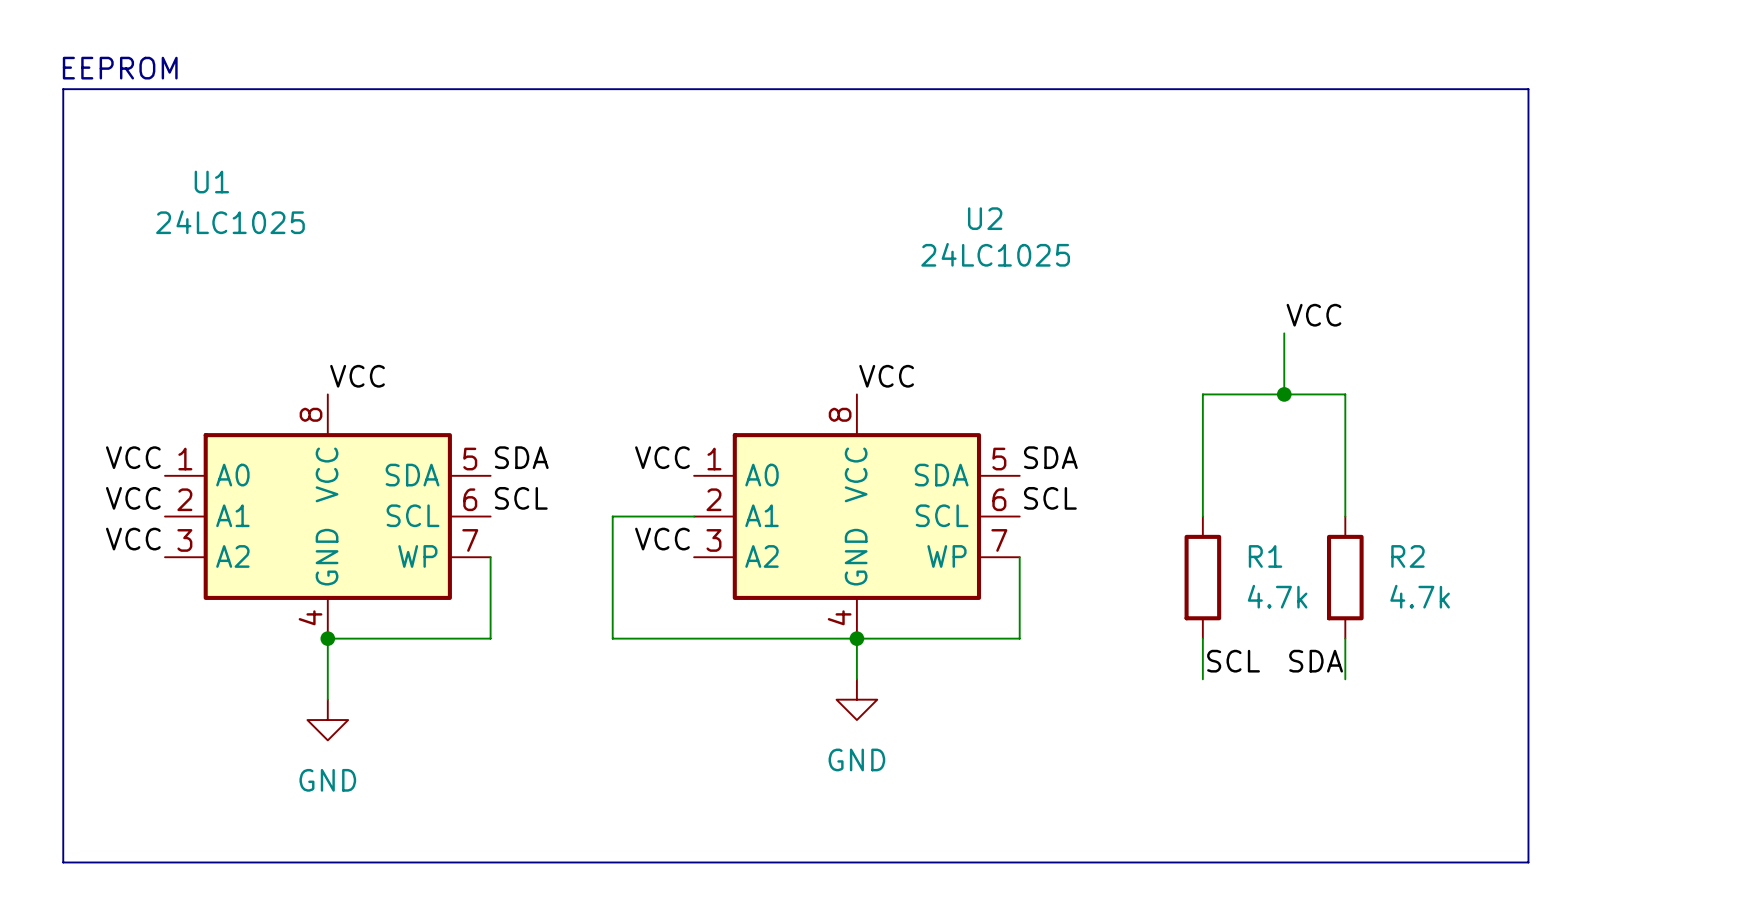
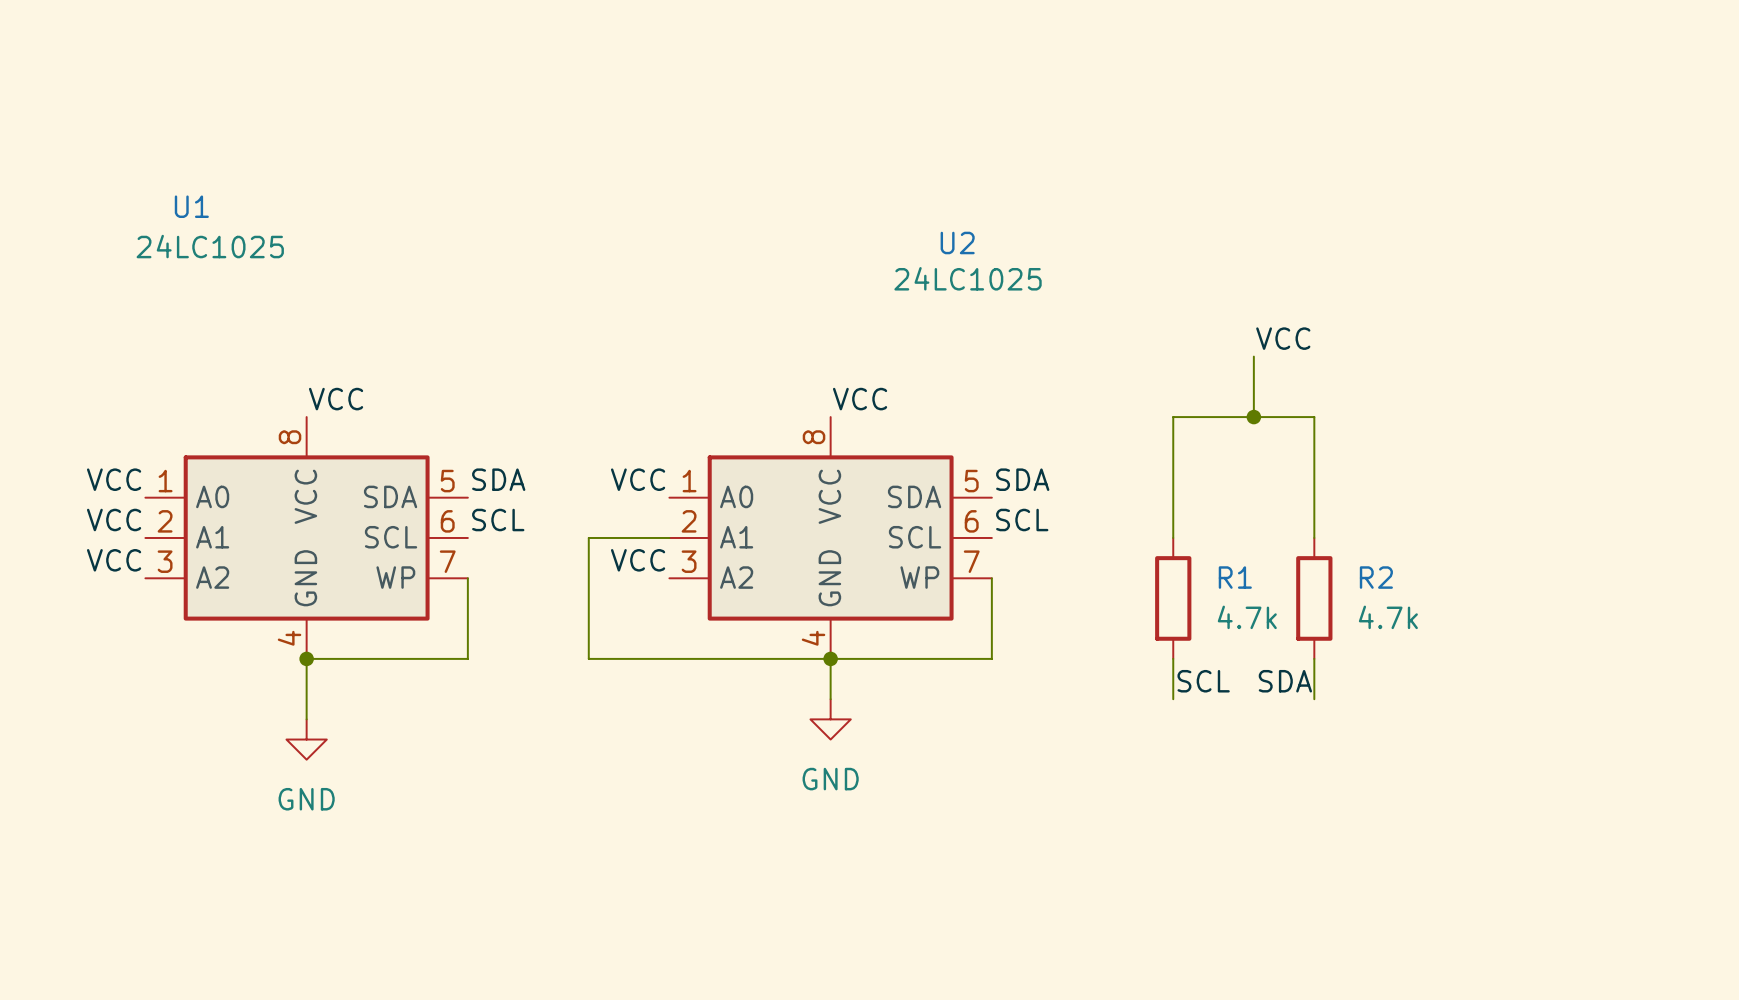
text: EEPROM (120, 68) -> none
line: (63, 89) (1528, 89) (1528, 862) (63, 862) (63, 89) -> none

